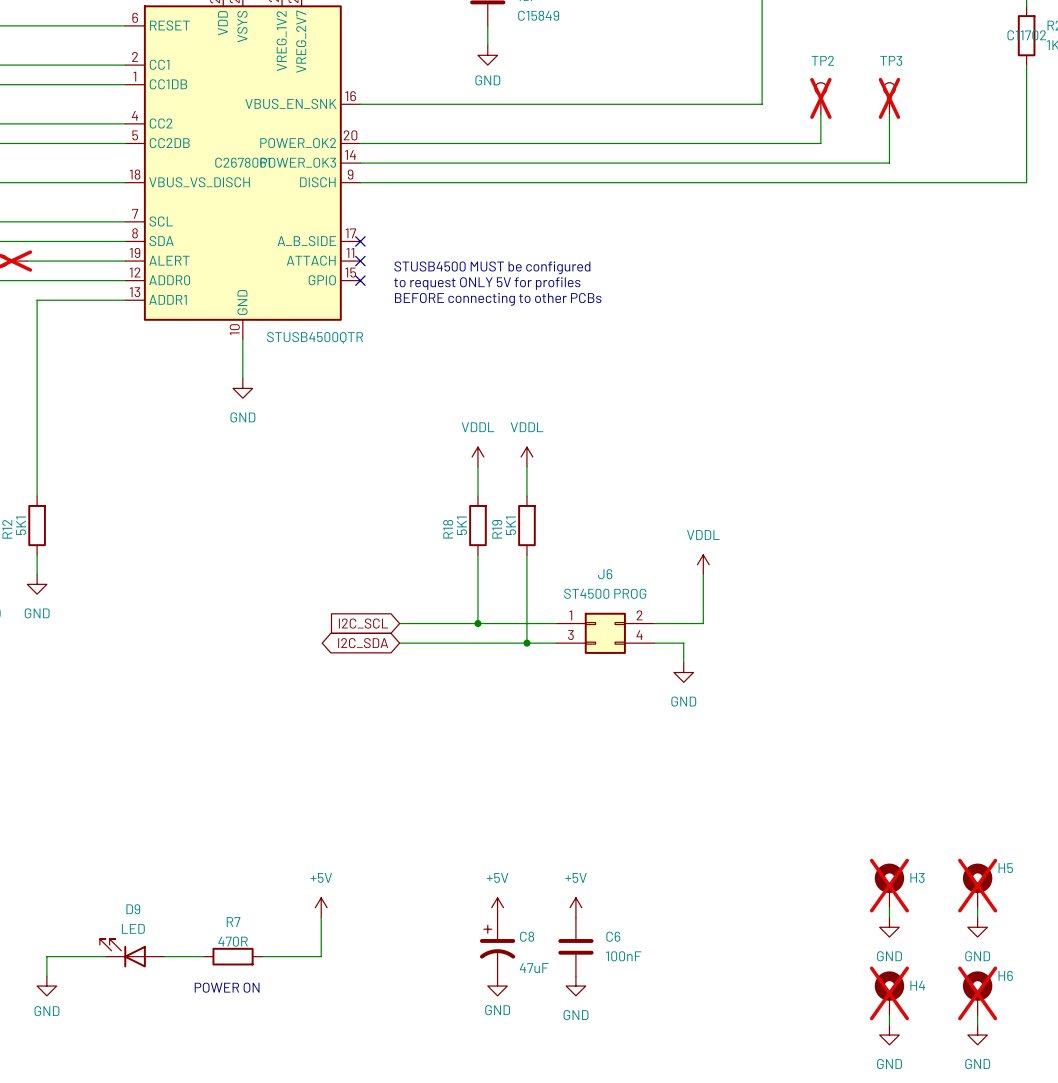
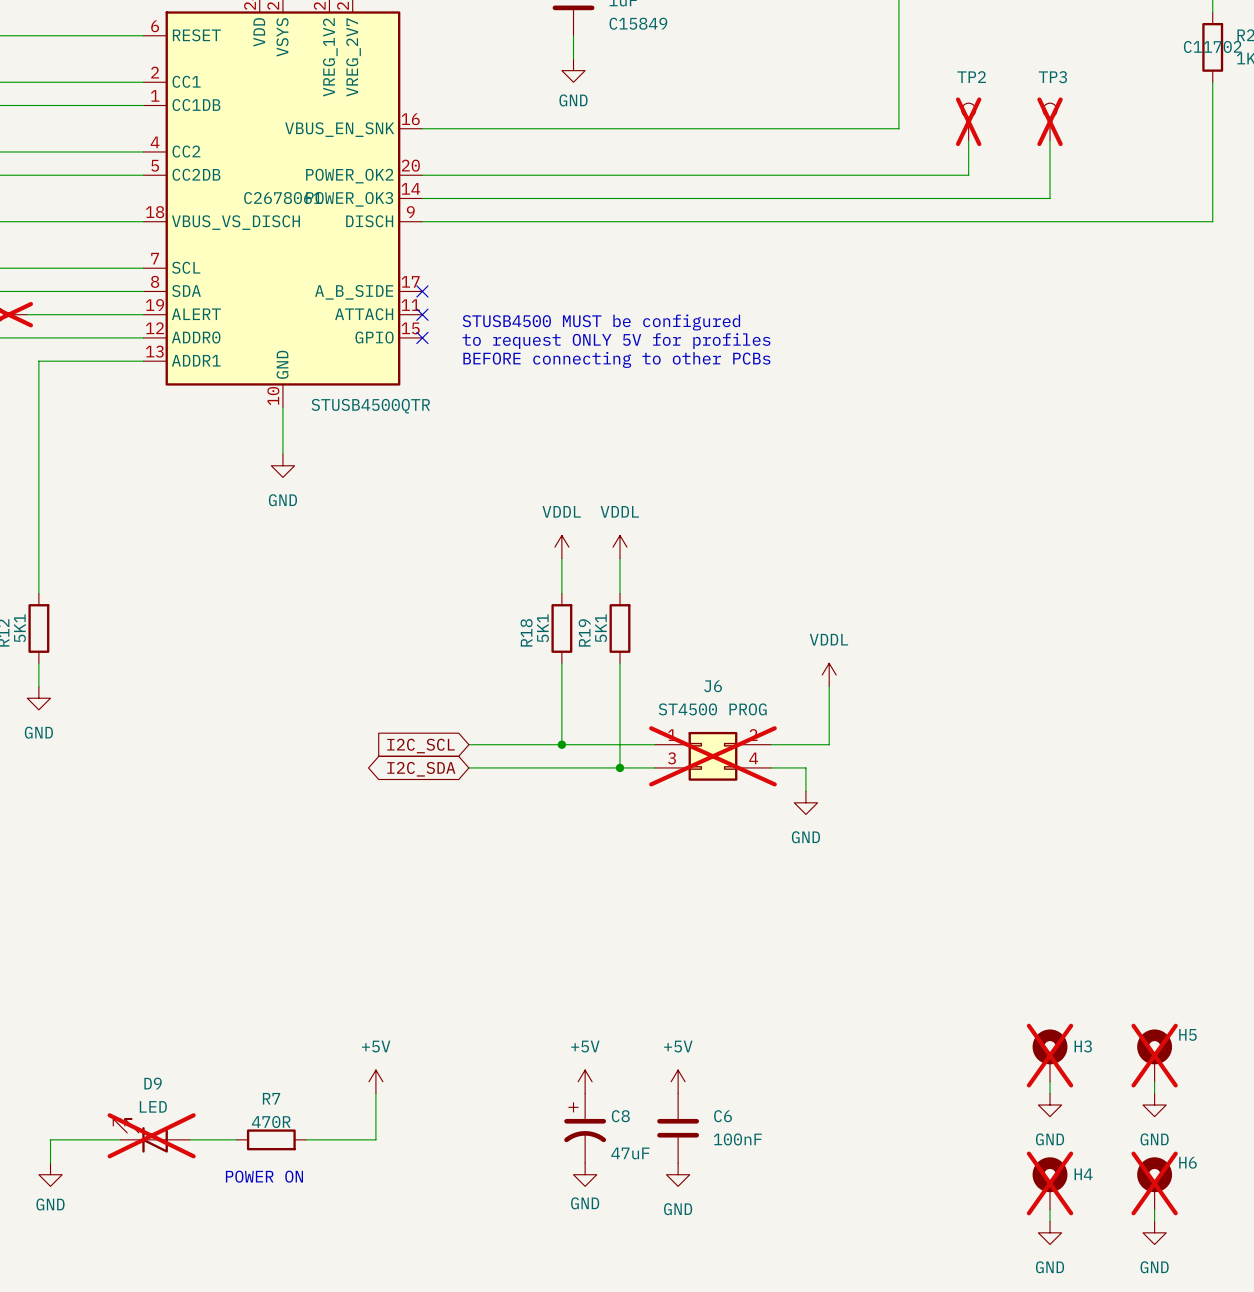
J6 do-not-place cross: none -> (712, 756)
D9 do-not-place cross: none -> (151, 1135)

